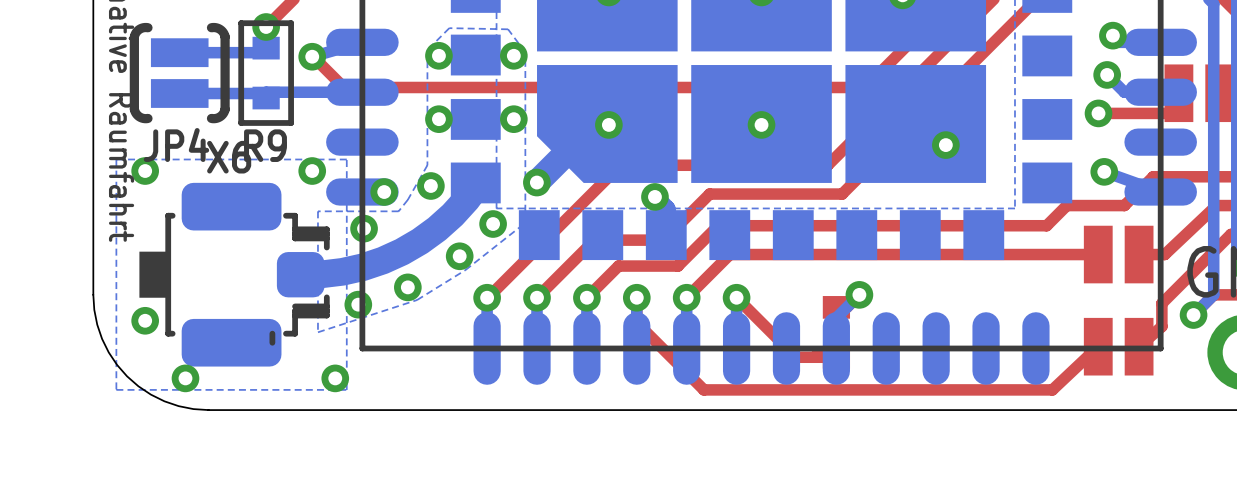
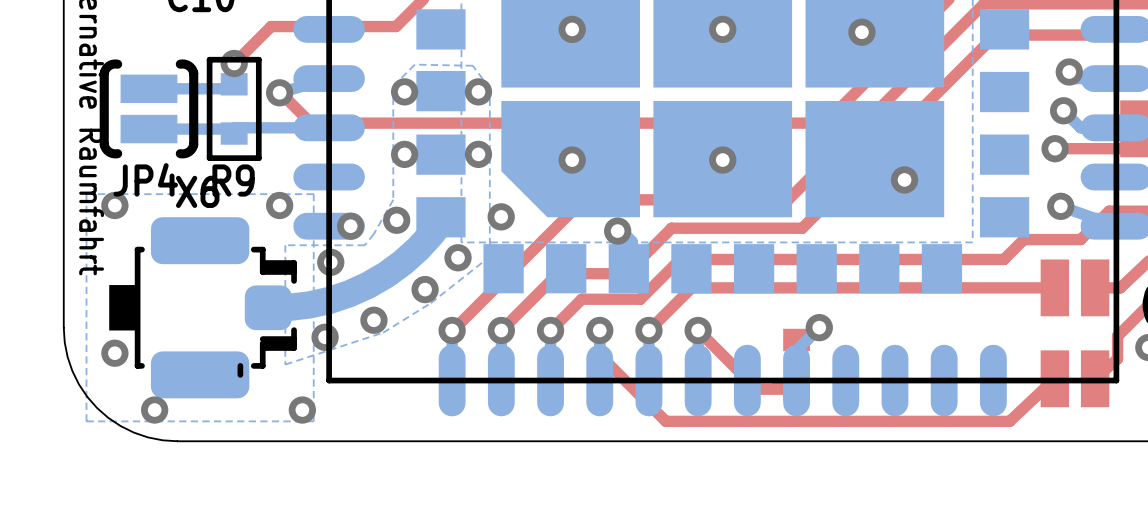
bottom track: (559, 159) (536, 182) -> none

